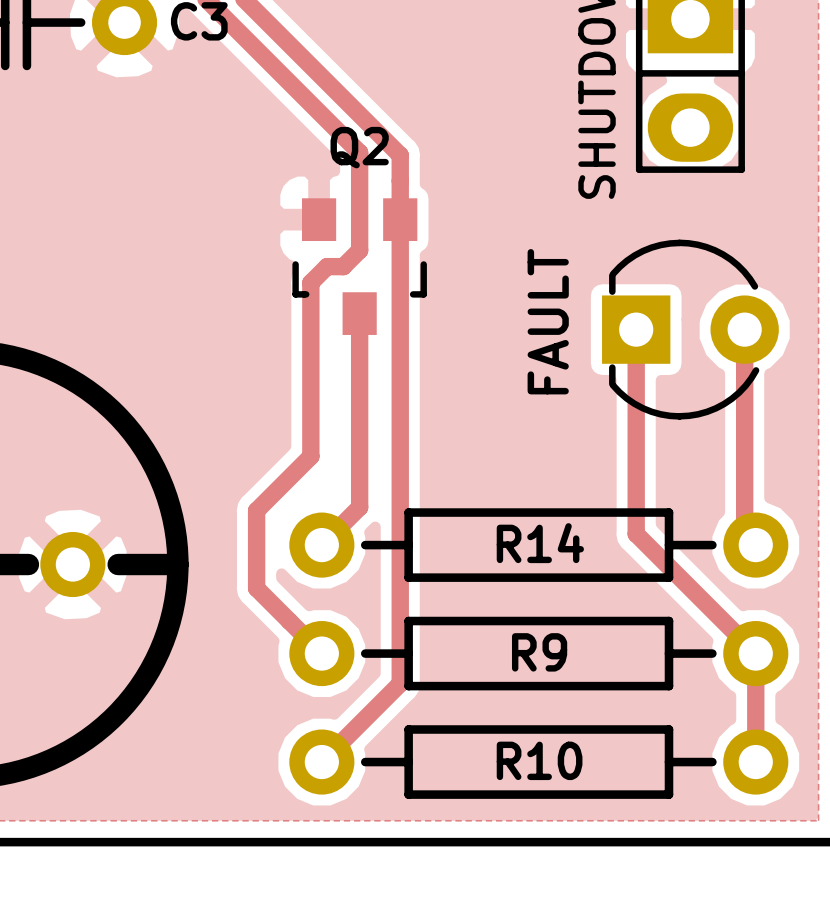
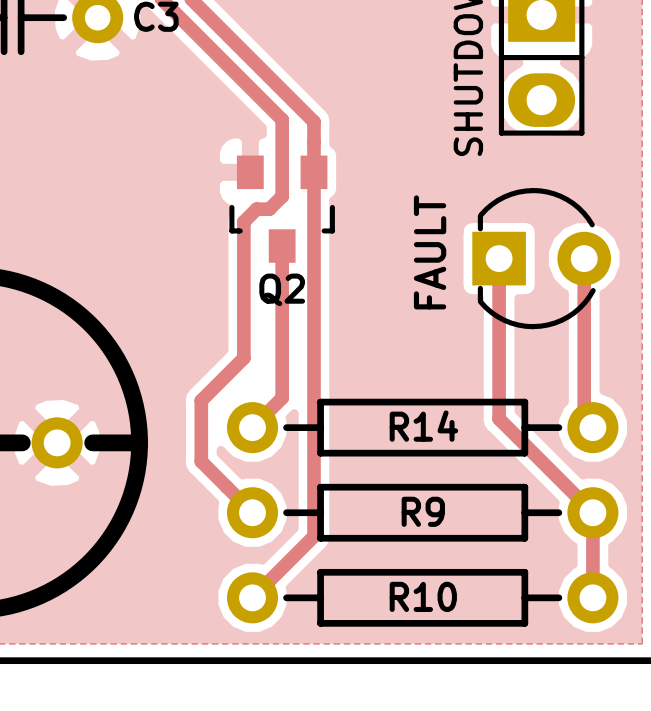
Q2 name position: Q2 (359, 147) -> Q2 (282, 289)

